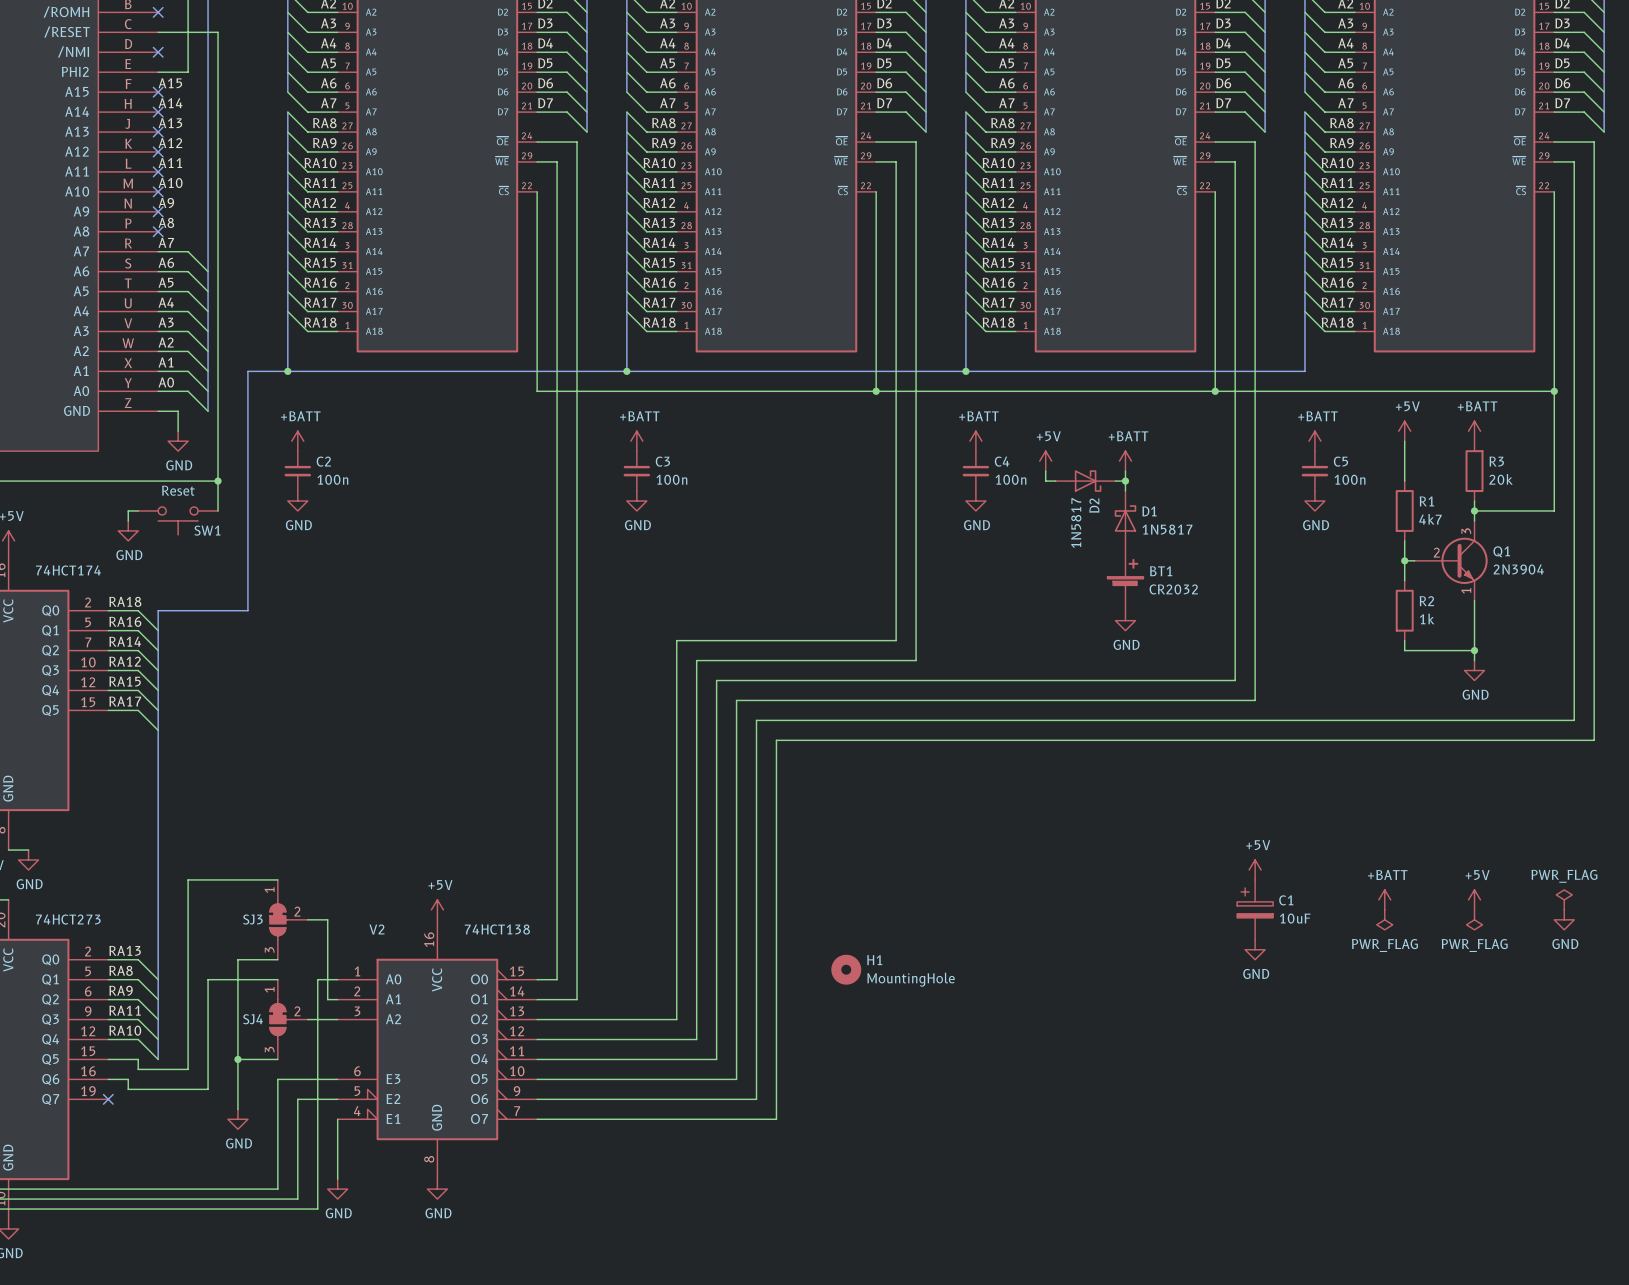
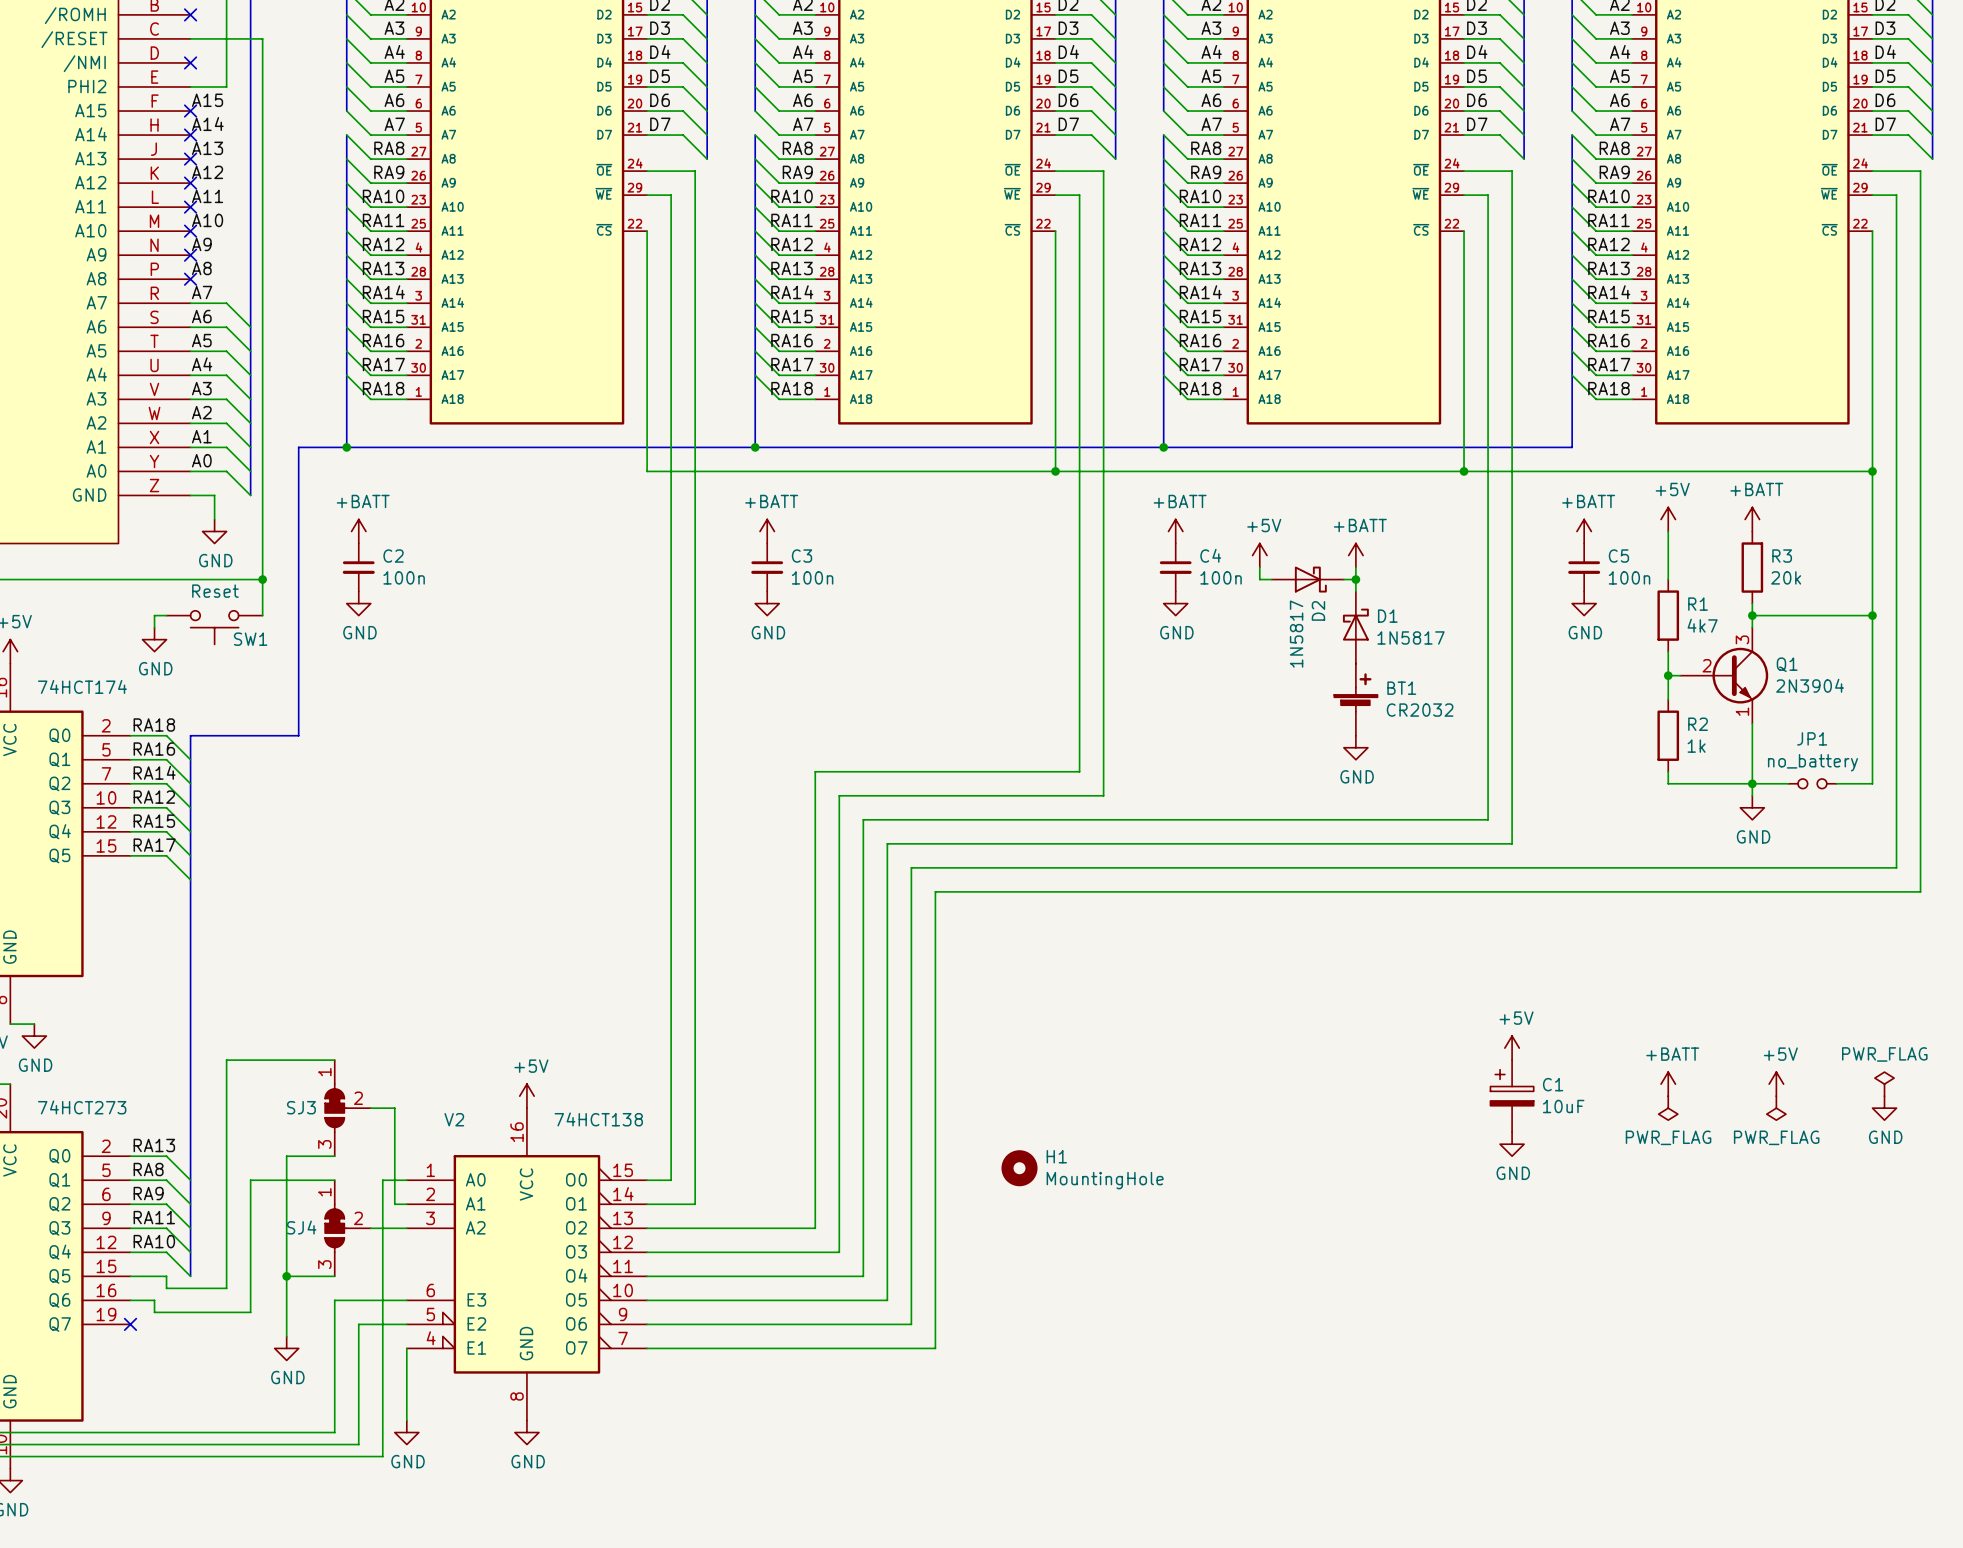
power symbol position: +5V (1404, 431) -> +5V (1668, 519)
power symbol position: +BATT (1474, 431) -> +BATT (1752, 519)
wire: (1404, 441) (1404, 481) -> (1668, 531) (1668, 579)
R3 position: (1474, 471) -> (1752, 567)
wire: (1474, 501) (1474, 520) -> (1752, 603) (1752, 627)
R1 position: (1404, 510) -> (1668, 615)
wire: none -> (1752, 615) (1776, 615)
junction position: (1474, 510) -> (1752, 615)
wire: none -> (1872, 615) (1872, 783) (1836, 783)
junction: none -> (1872, 615)
wire: (1404, 540) (1404, 580) -> (1668, 651) (1668, 699)
junction position: (1404, 560) -> (1668, 675)
Q1 position: (1451, 560) -> (1724, 675)
wire: (1474, 600) (1474, 660) -> (1752, 723) (1752, 795)
R2 position: (1404, 610) -> (1668, 735)
wire: (1404, 640) (1404, 650) -> (1668, 771) (1668, 783) (1692, 783)
wire: none -> (1776, 783) (1788, 783)
junction position: (1474, 650) -> (1752, 783)
JP1: none -> no_battery (1812, 783)
power symbol position: GND (1474, 670) -> GND (1752, 807)

